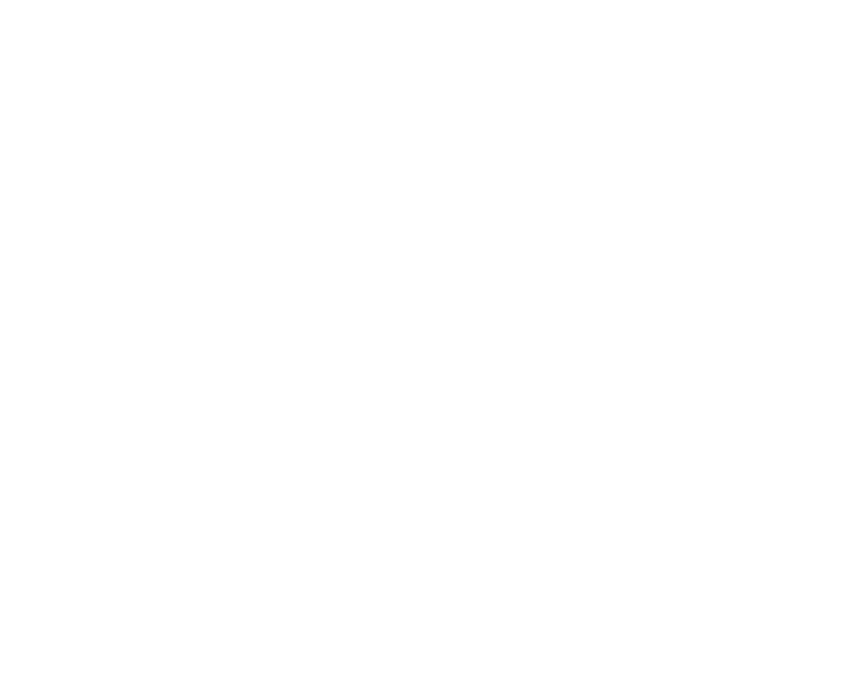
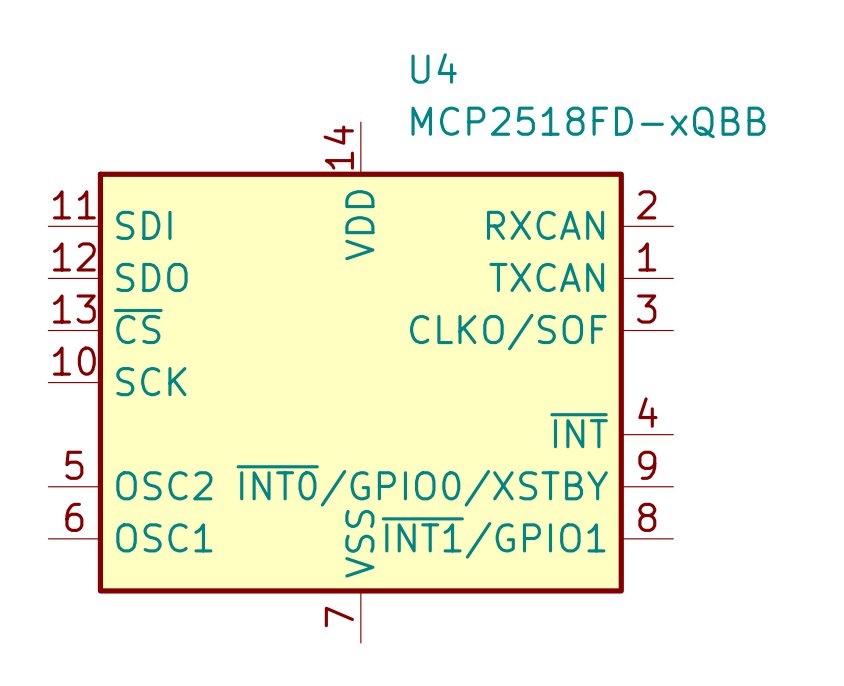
U4: none -> MCP2518FD-xQBB (360, 382)

